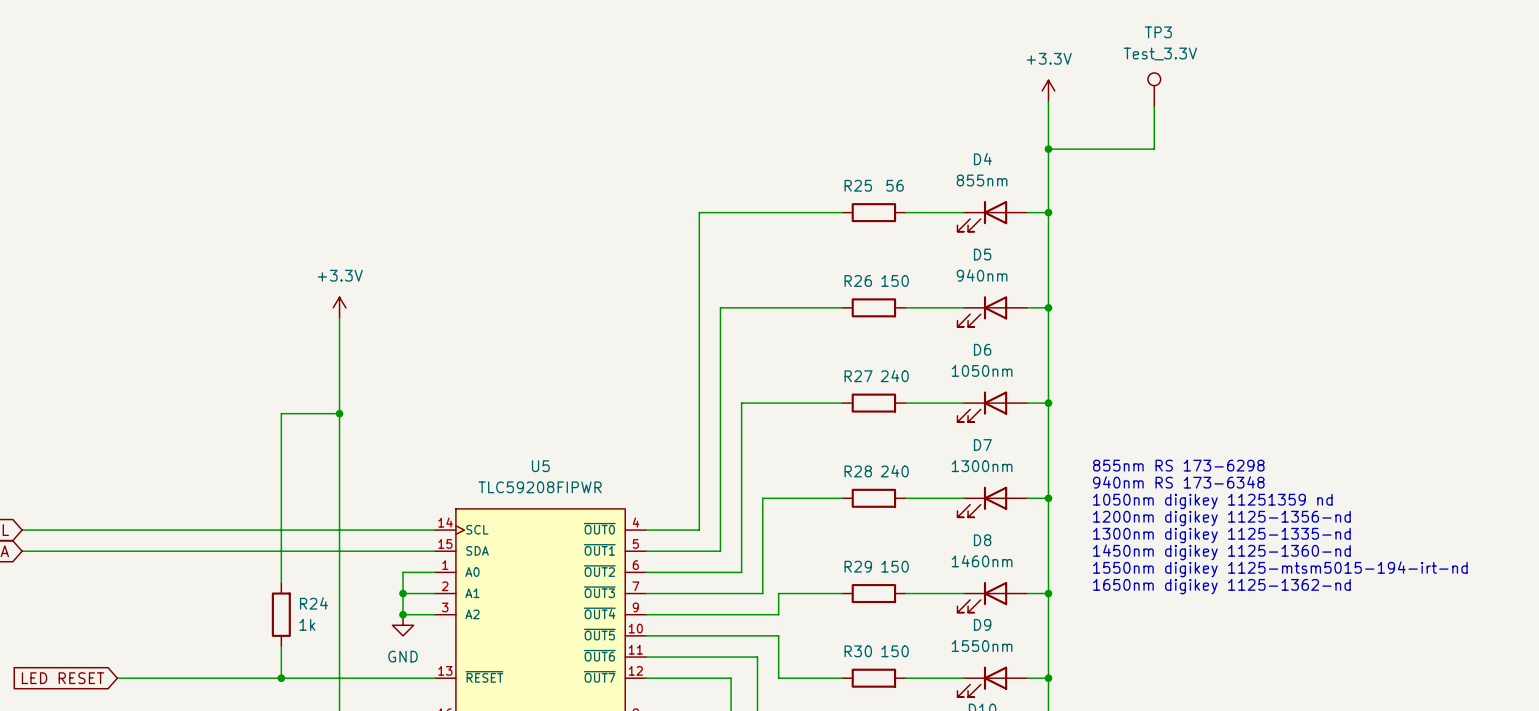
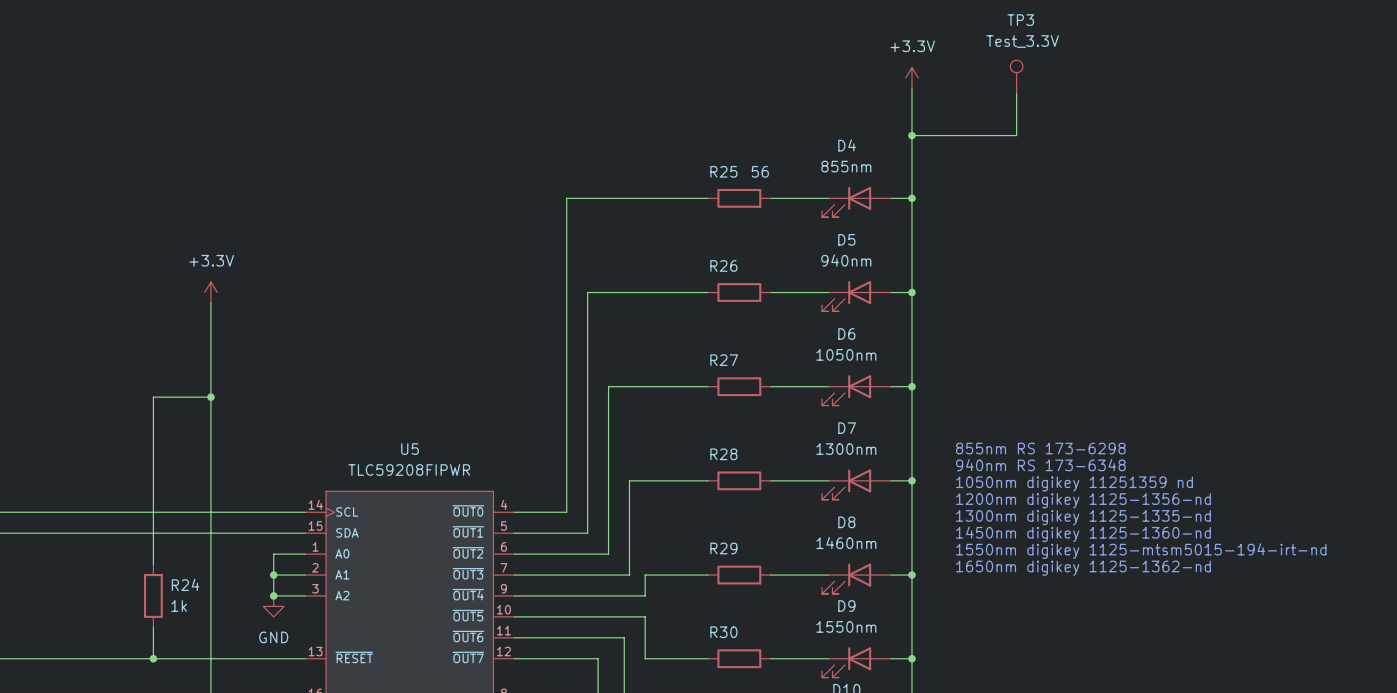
R26 value: 150 (895, 281) -> none
R27 value: 240 (894, 375) -> none
R28 value: 240 (894, 471) -> none
R29 value: 150 (895, 566) -> none
R30 value: 150 (895, 651) -> none

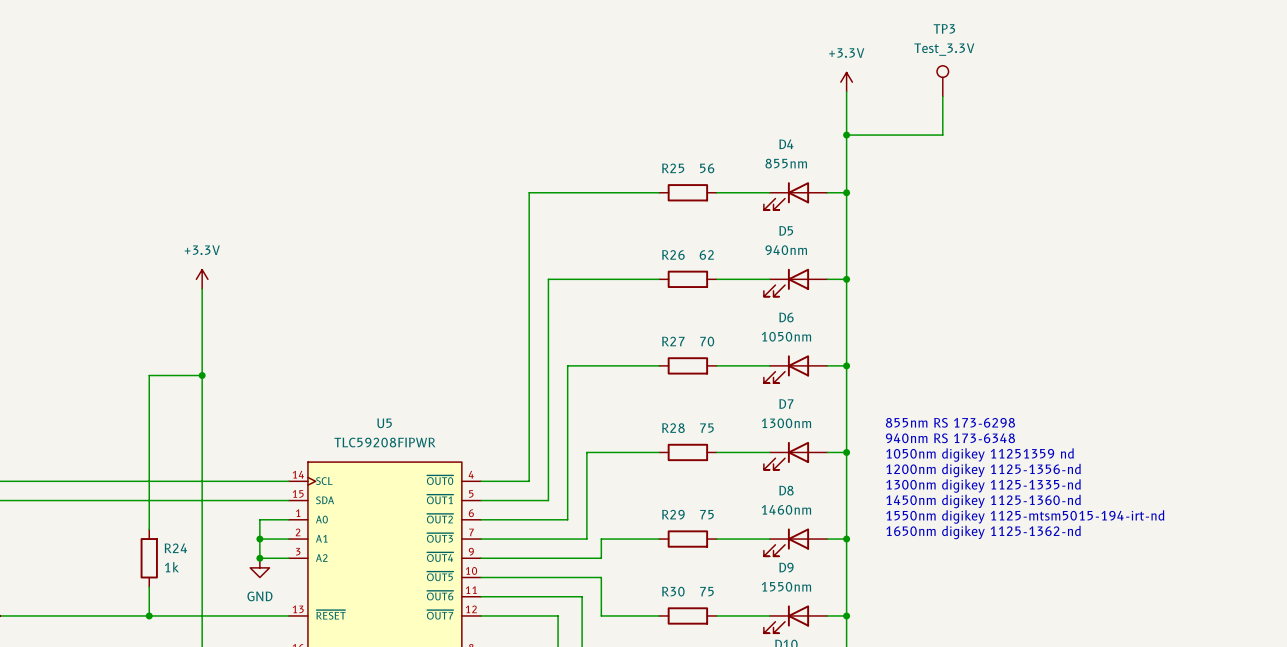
R26 value: none -> 62 (706, 254)
R27 value: none -> 70 (707, 341)
R28 value: none -> 75 (706, 428)
R29 value: none -> 75 (706, 514)
R30 value: none -> 75 (706, 591)

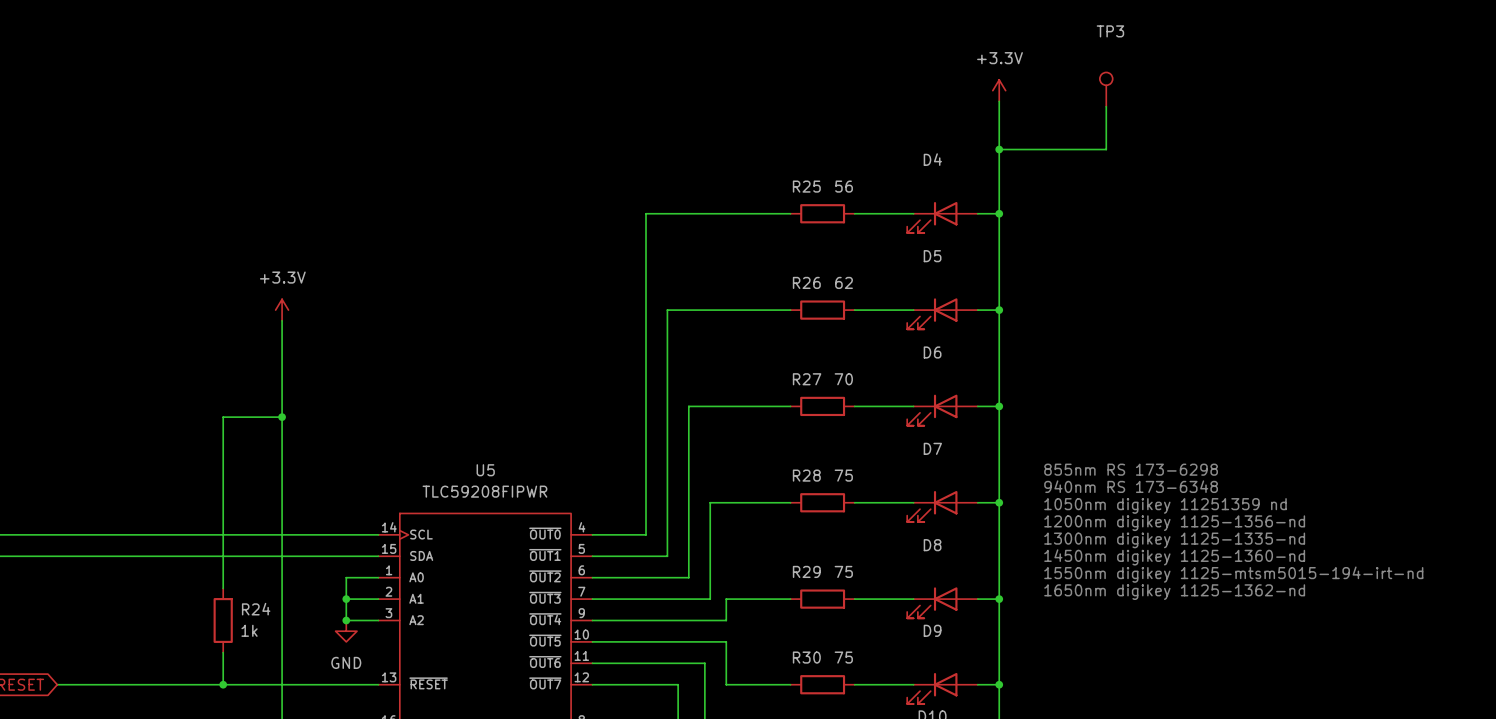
TP3 value: Test_3.3V (944, 49) -> none
D4 value: 855nm (786, 163) -> none
D5 value: 940nm (786, 250) -> none
D6 value: 1050nm (786, 336) -> none
D7 value: 1300nm (786, 423) -> none
D8 value: 1460nm (786, 509) -> none
D9 value: 1550nm (786, 586) -> none

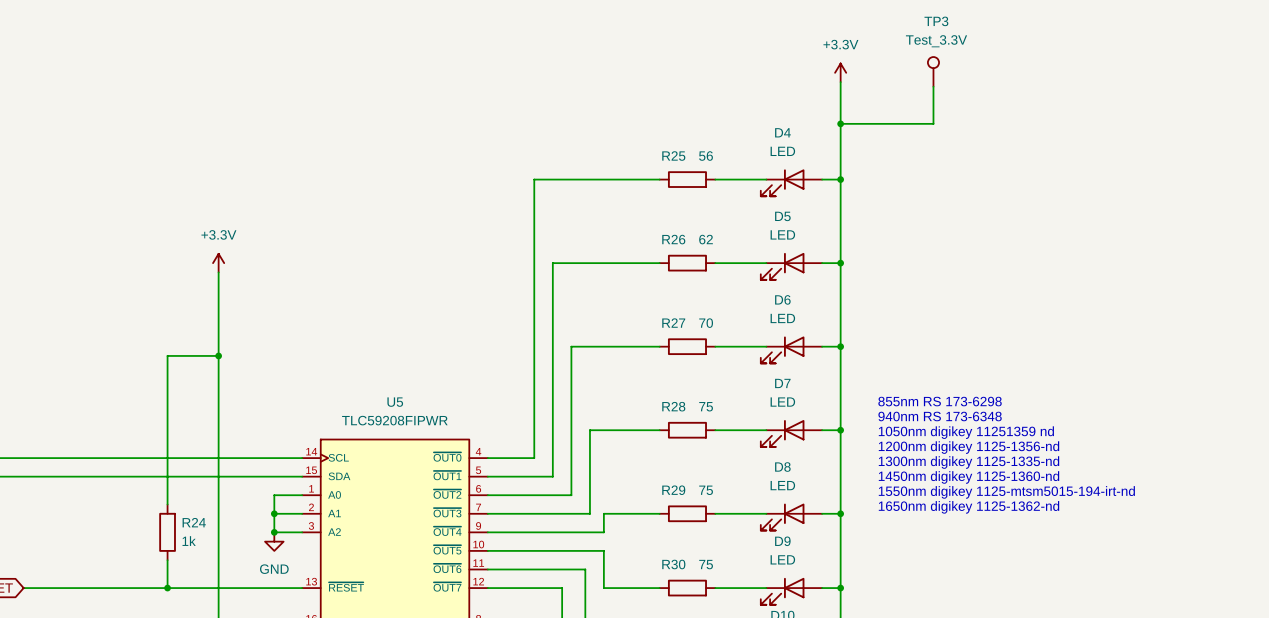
TP3 value: none -> Test_3.3V (936, 41)
D4 value: none -> LED (782, 151)
D5 value: none -> LED (782, 234)
D6 value: none -> LED (782, 318)
D7 value: none -> LED (782, 402)
D8 value: none -> LED (782, 485)
D9 value: none -> LED (782, 559)

